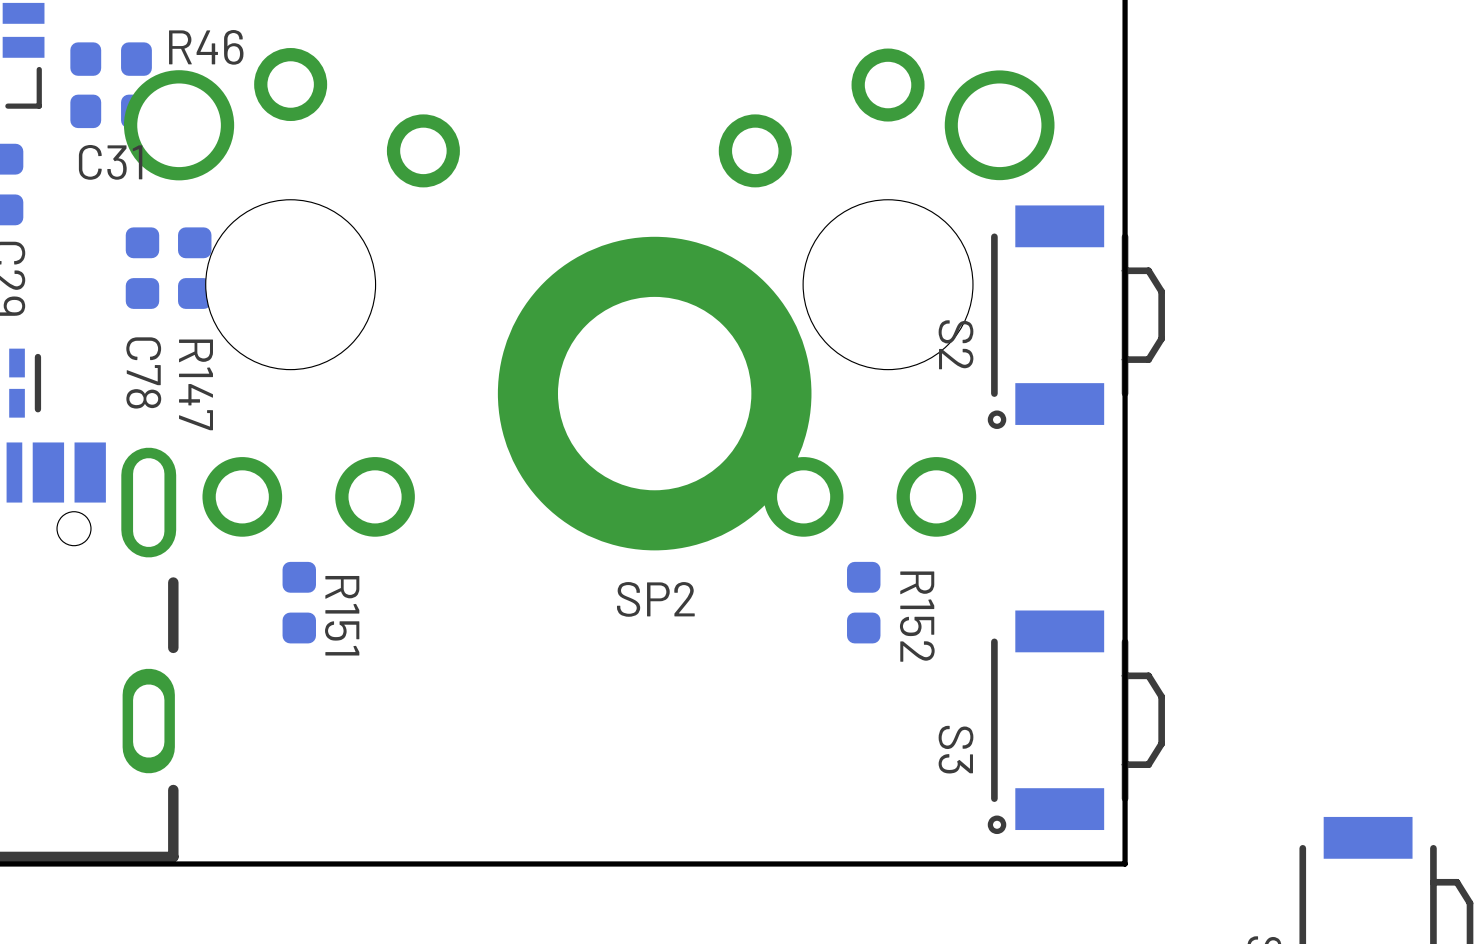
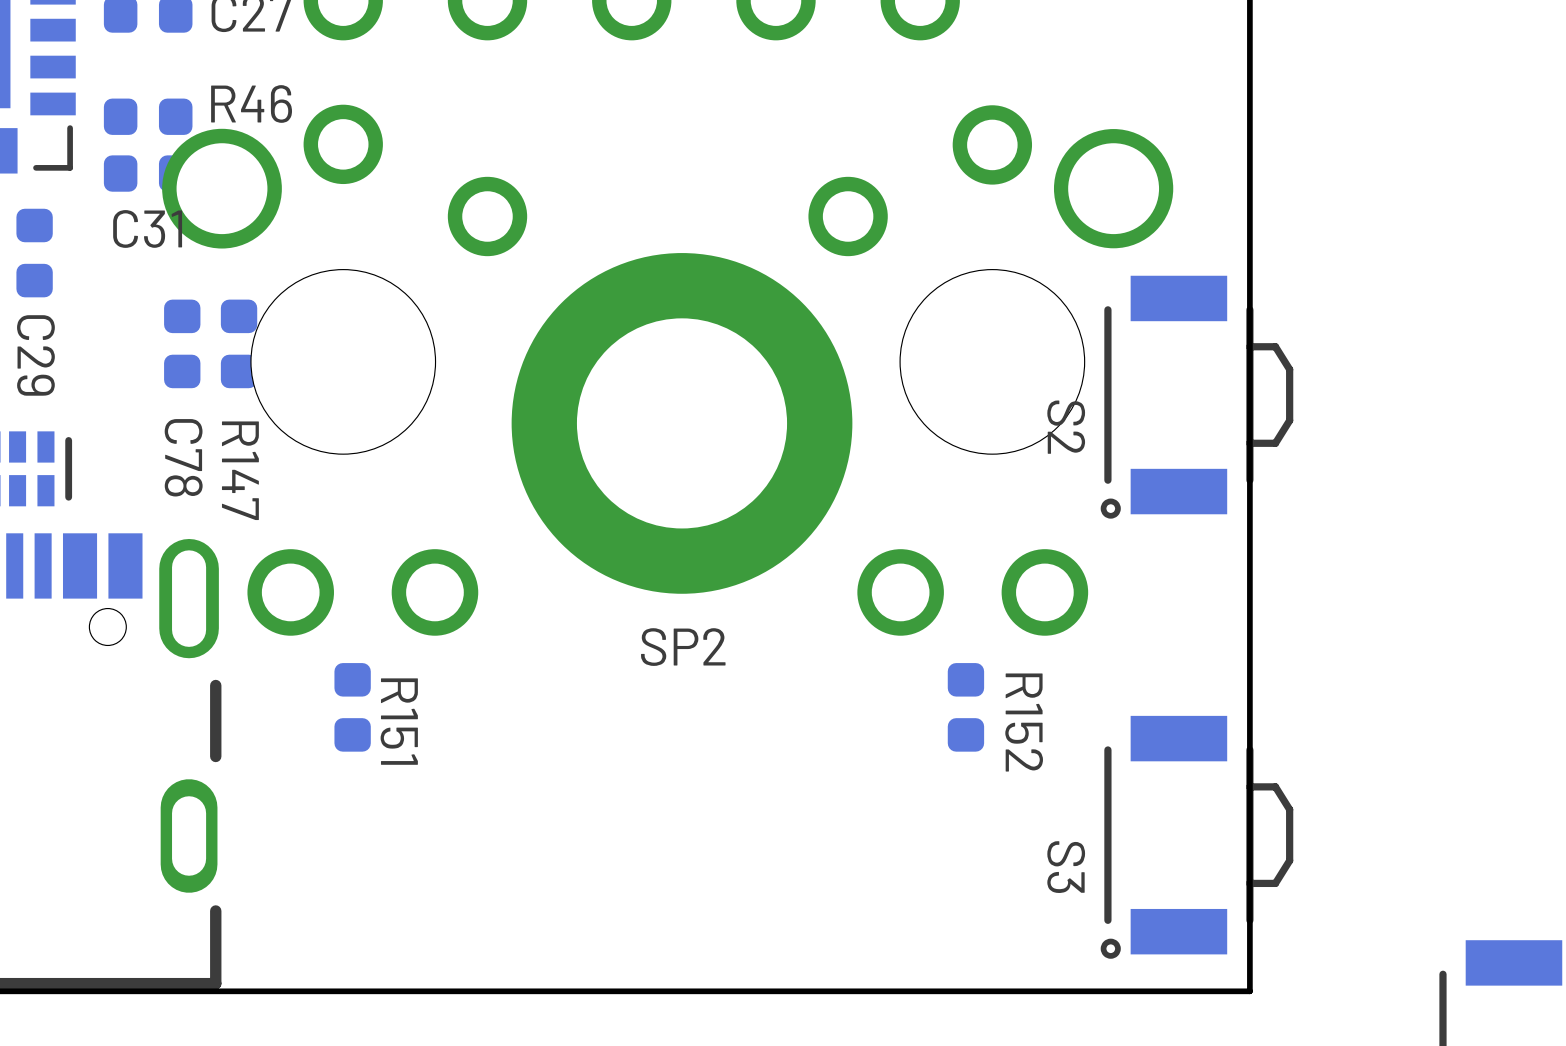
SP2 position: (654, 393) -> (682, 423)

